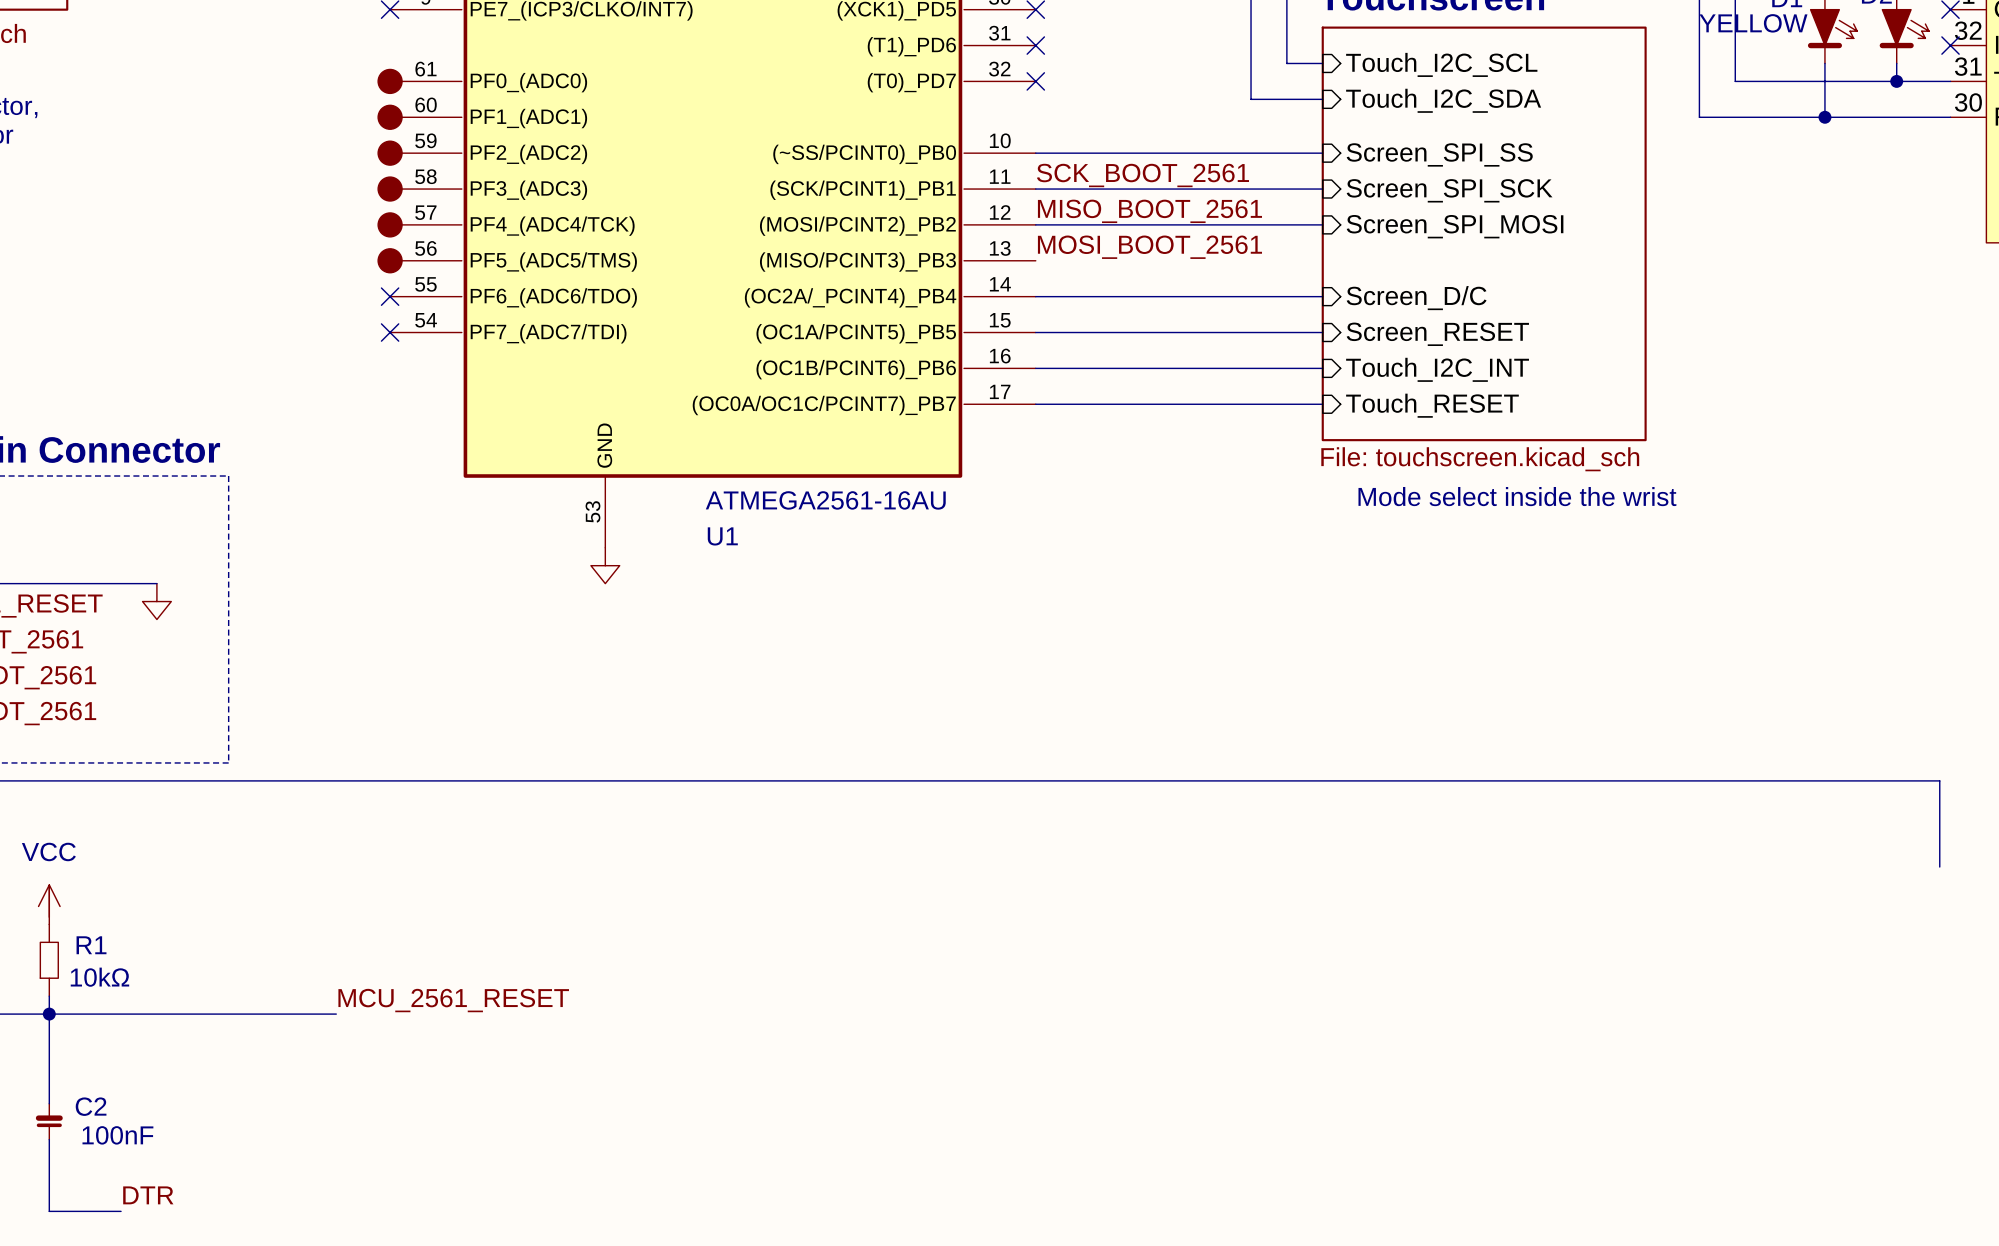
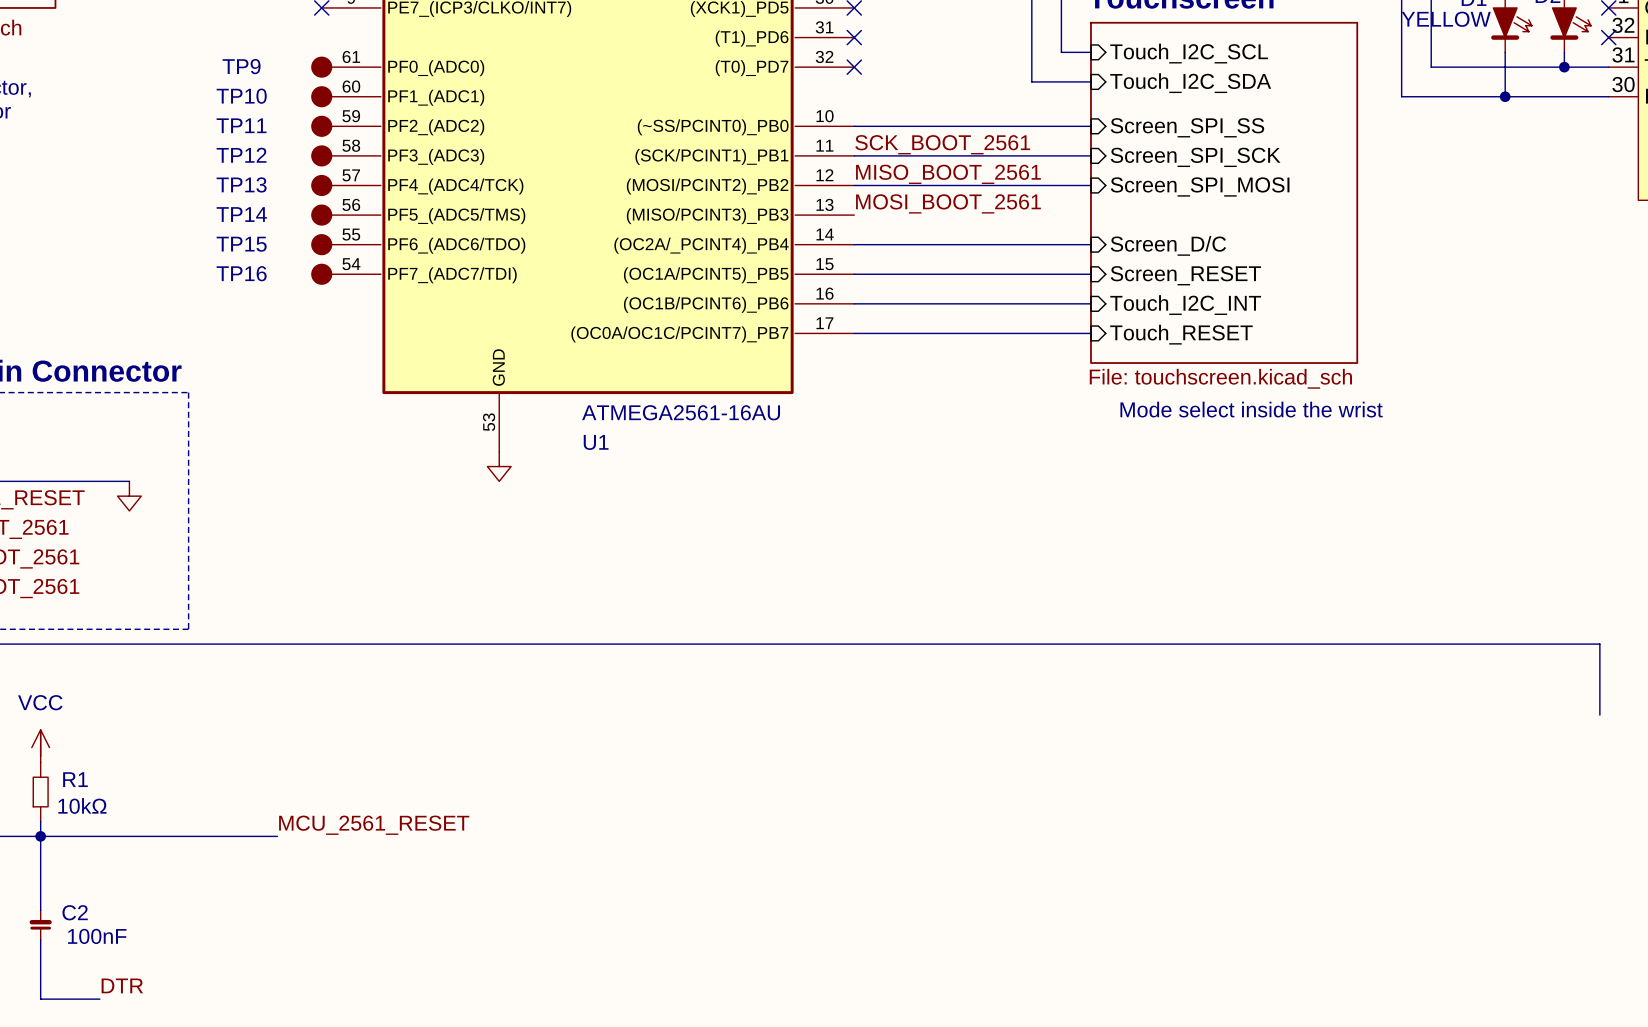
TP9 name: none -> TP9 (241, 66)
TP10 name: none -> TP10 (241, 96)
TP11 name: none -> TP11 (241, 125)
TP12 name: none -> TP12 (241, 155)
TP13 name: none -> TP13 (241, 184)
TP14 name: none -> TP14 (241, 214)
no-connect mark: (390, 296) -> none
TP15: none -> (321, 244)
no-connect mark: (390, 332) -> none
TP16: none -> (321, 274)

